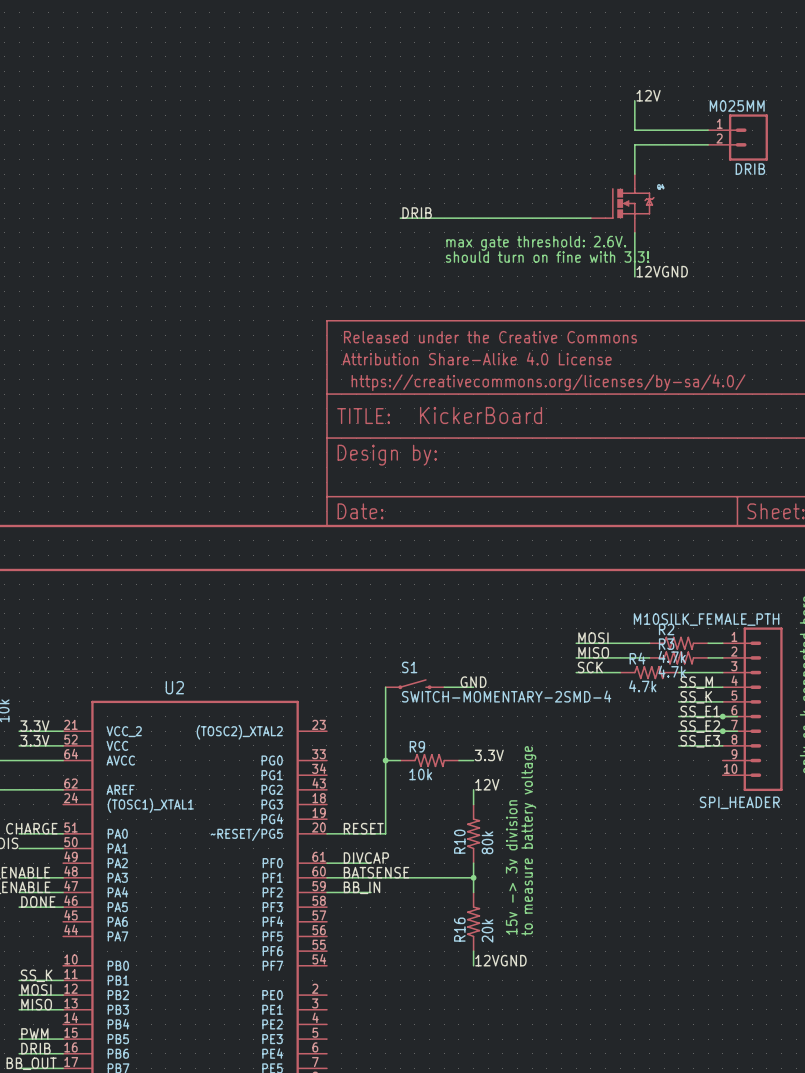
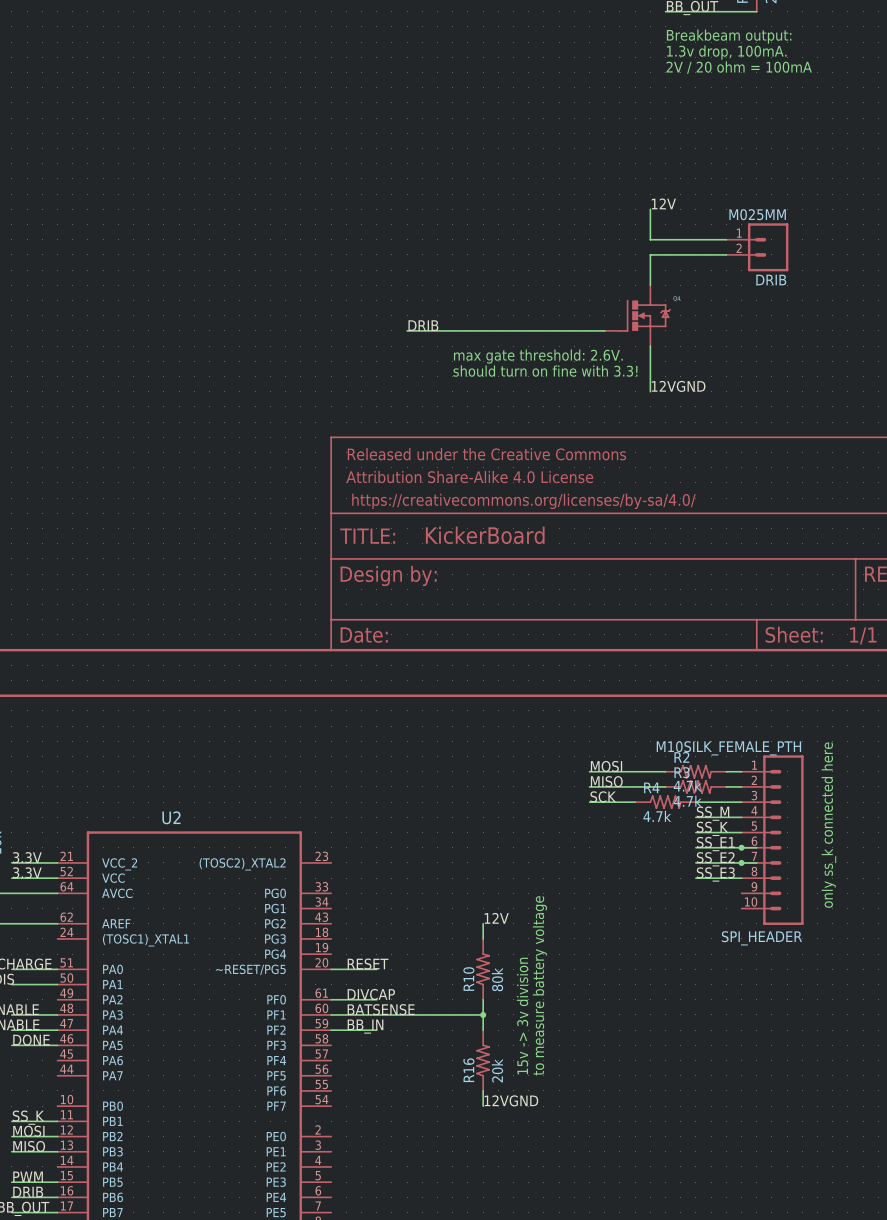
label: GND (473, 682) -> none
S1: SWITCH-MOMENTARY-2SMD-4 (414, 684) -> none
wire: (385, 687) (385, 833) (370, 833) -> none
wire: (444, 687) (473, 687) -> none
label: 3.3V (489, 755) -> none
wire: (385, 760) (400, 760) -> none
junction: (385, 760) -> none
R9: 10k (429, 760) -> none
wire: (458, 760) (473, 760) -> none

